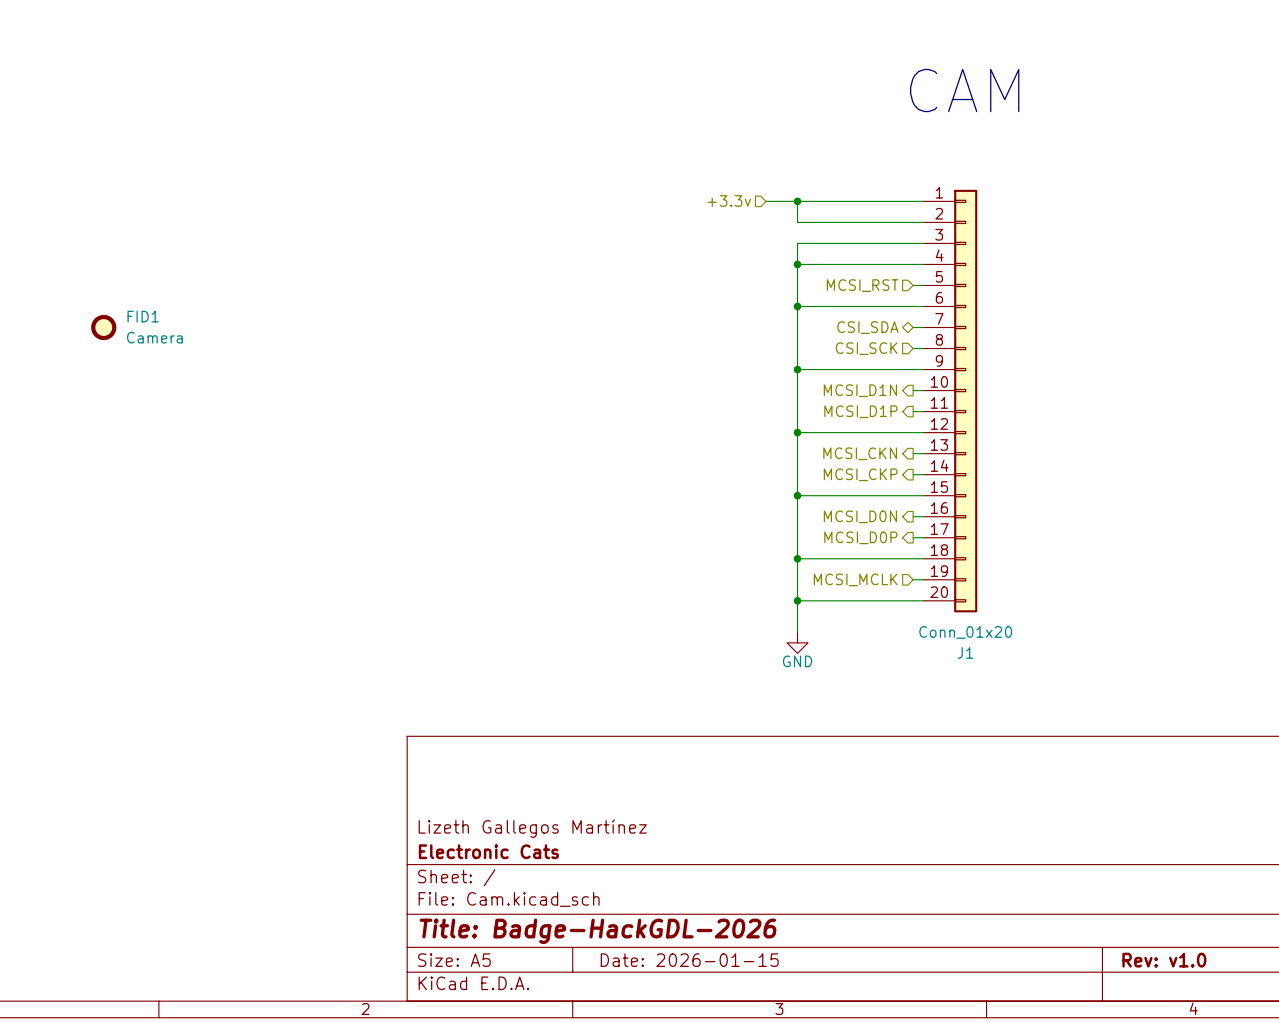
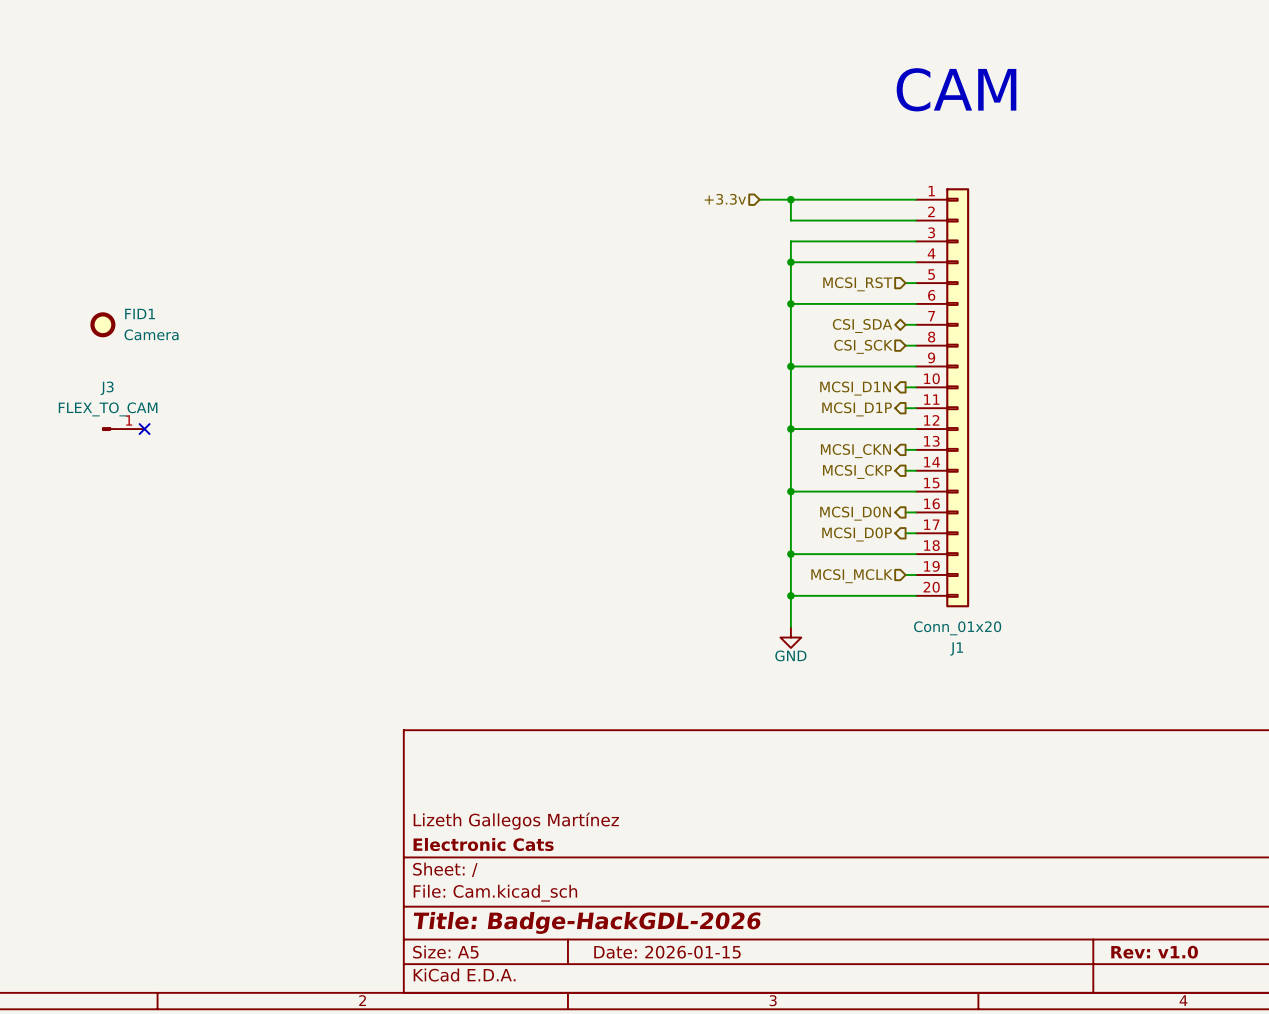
J3: none -> FLEX_TO_CAM (123, 429)
no-connect mark: none -> (144, 429)

